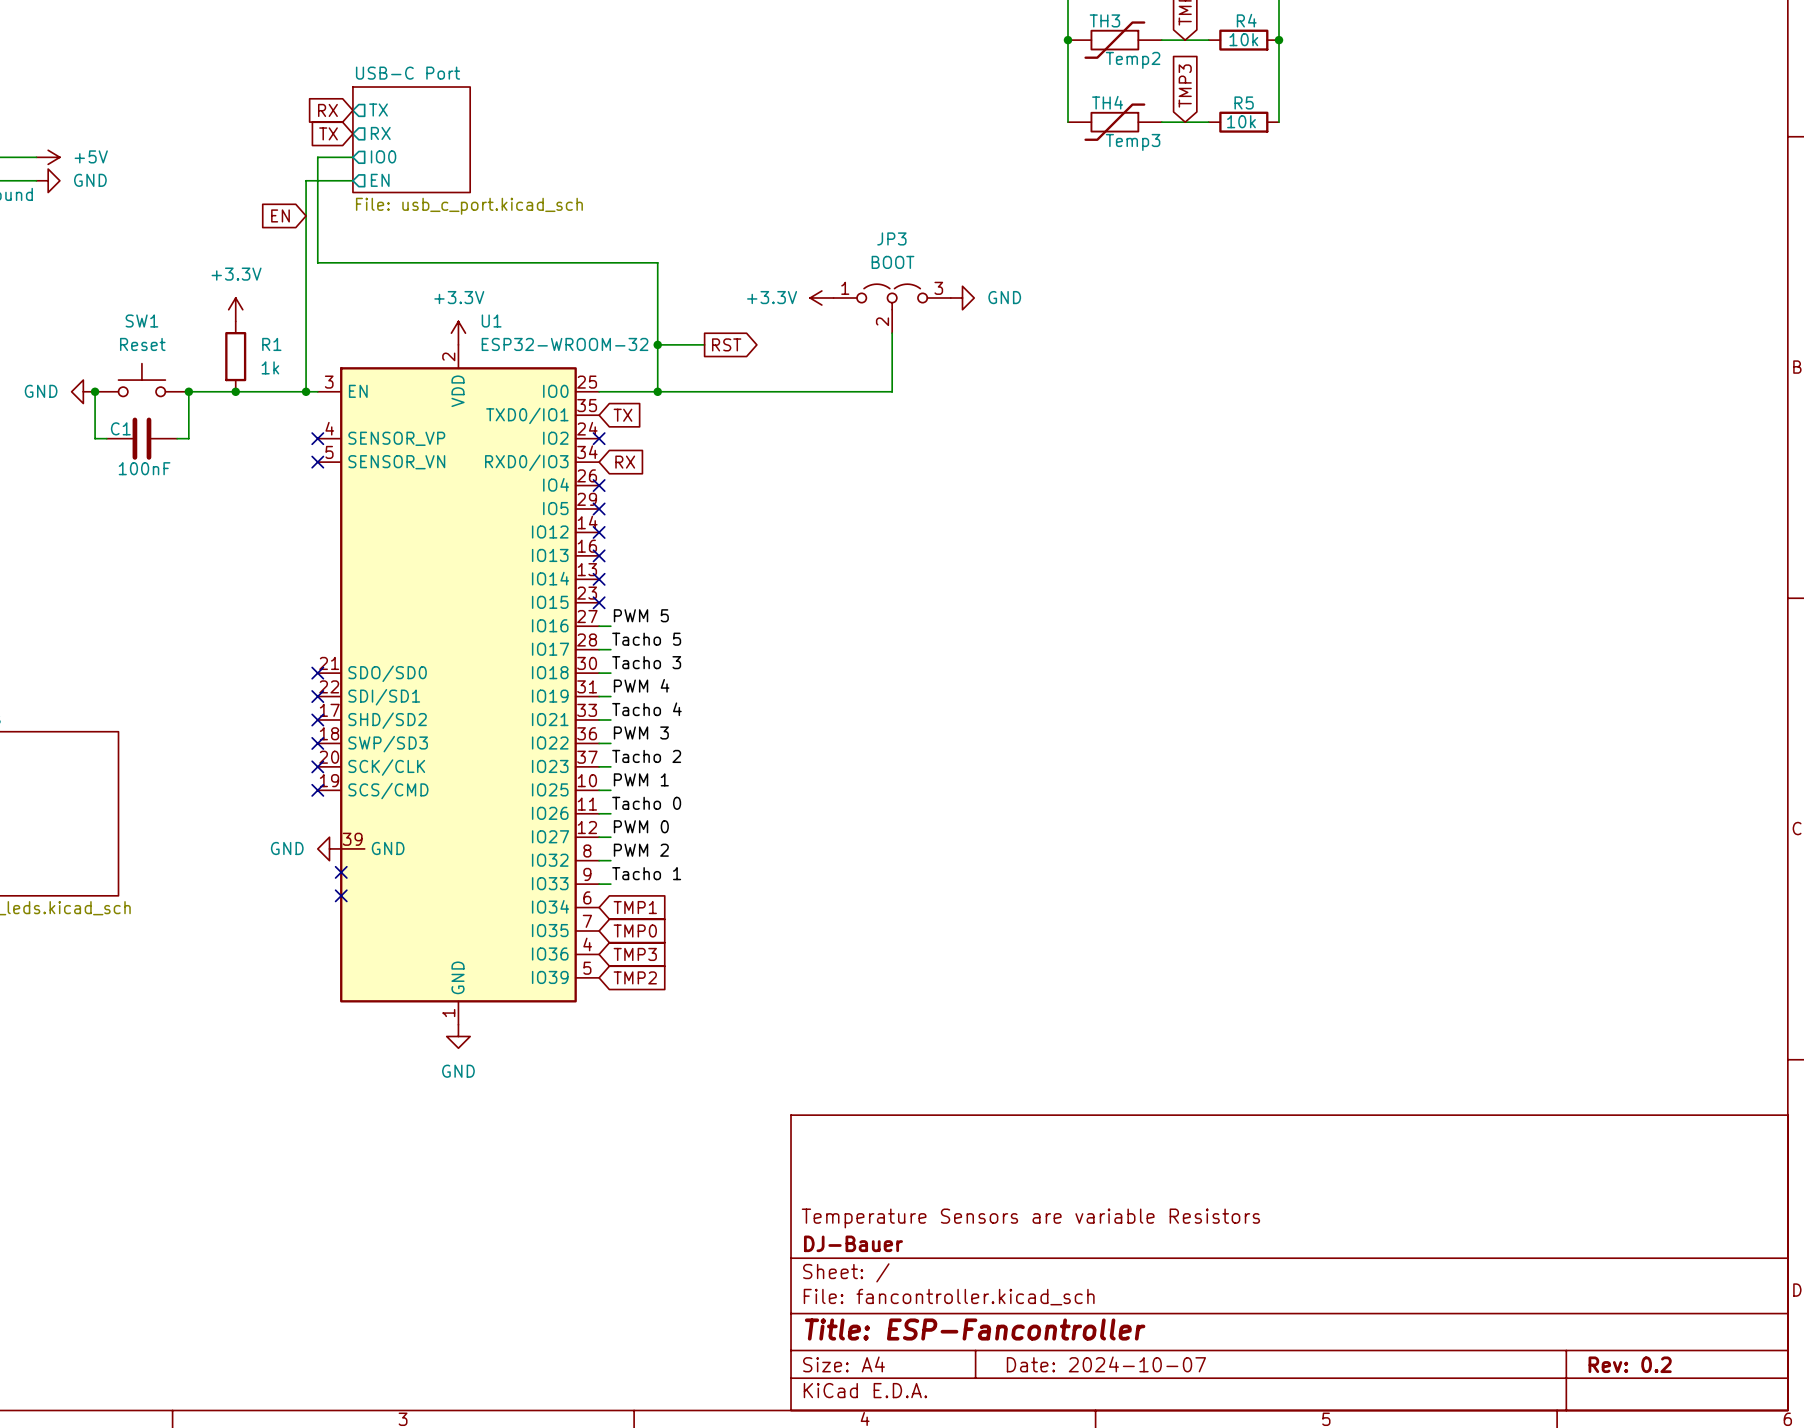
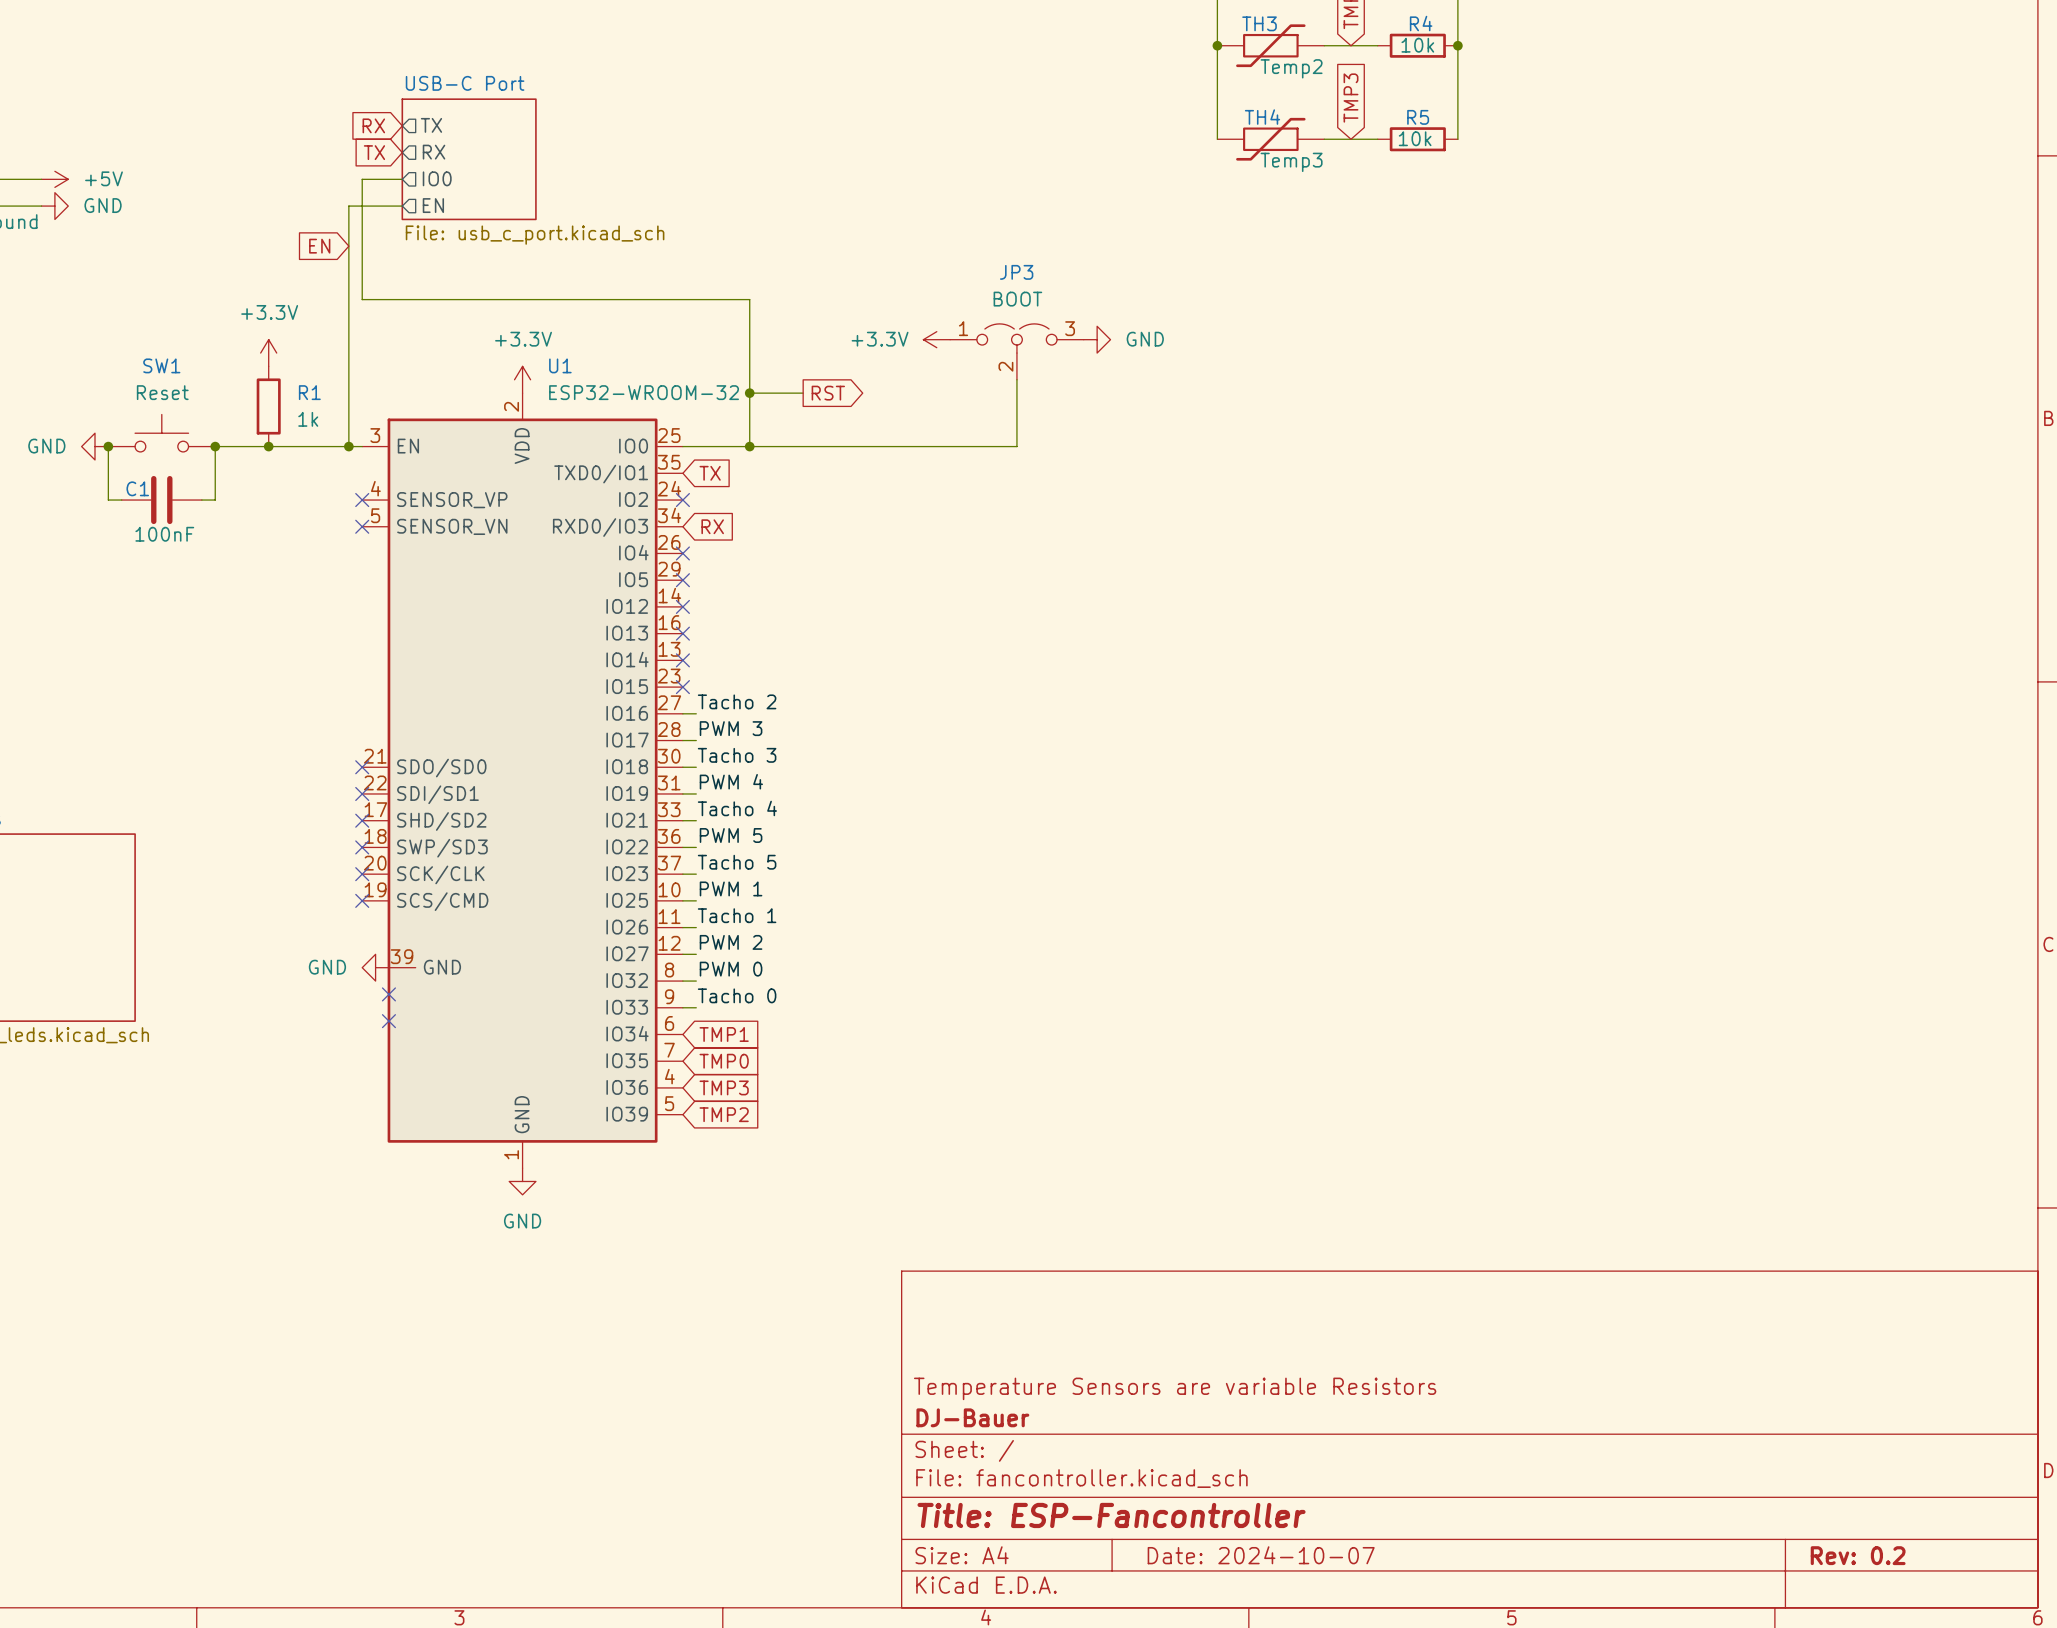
label: PWM 5 (641, 615) -> Tacho 2 (737, 701)
label: Tacho 5 (646, 639) -> PWM 3 (731, 728)
label: PWM 3 (641, 732) -> PWM 5 (731, 835)
label: Tacho 2 (646, 756) -> Tacho 5 (737, 862)
label: Tacho 0 (646, 803) -> Tacho 1 (737, 915)
label: PWM 0 (641, 826) -> PWM 2 (731, 942)
label: PWM 2 (641, 850) -> PWM 0 (731, 969)
label: Tacho 1 (646, 873) -> Tacho 0 (737, 995)

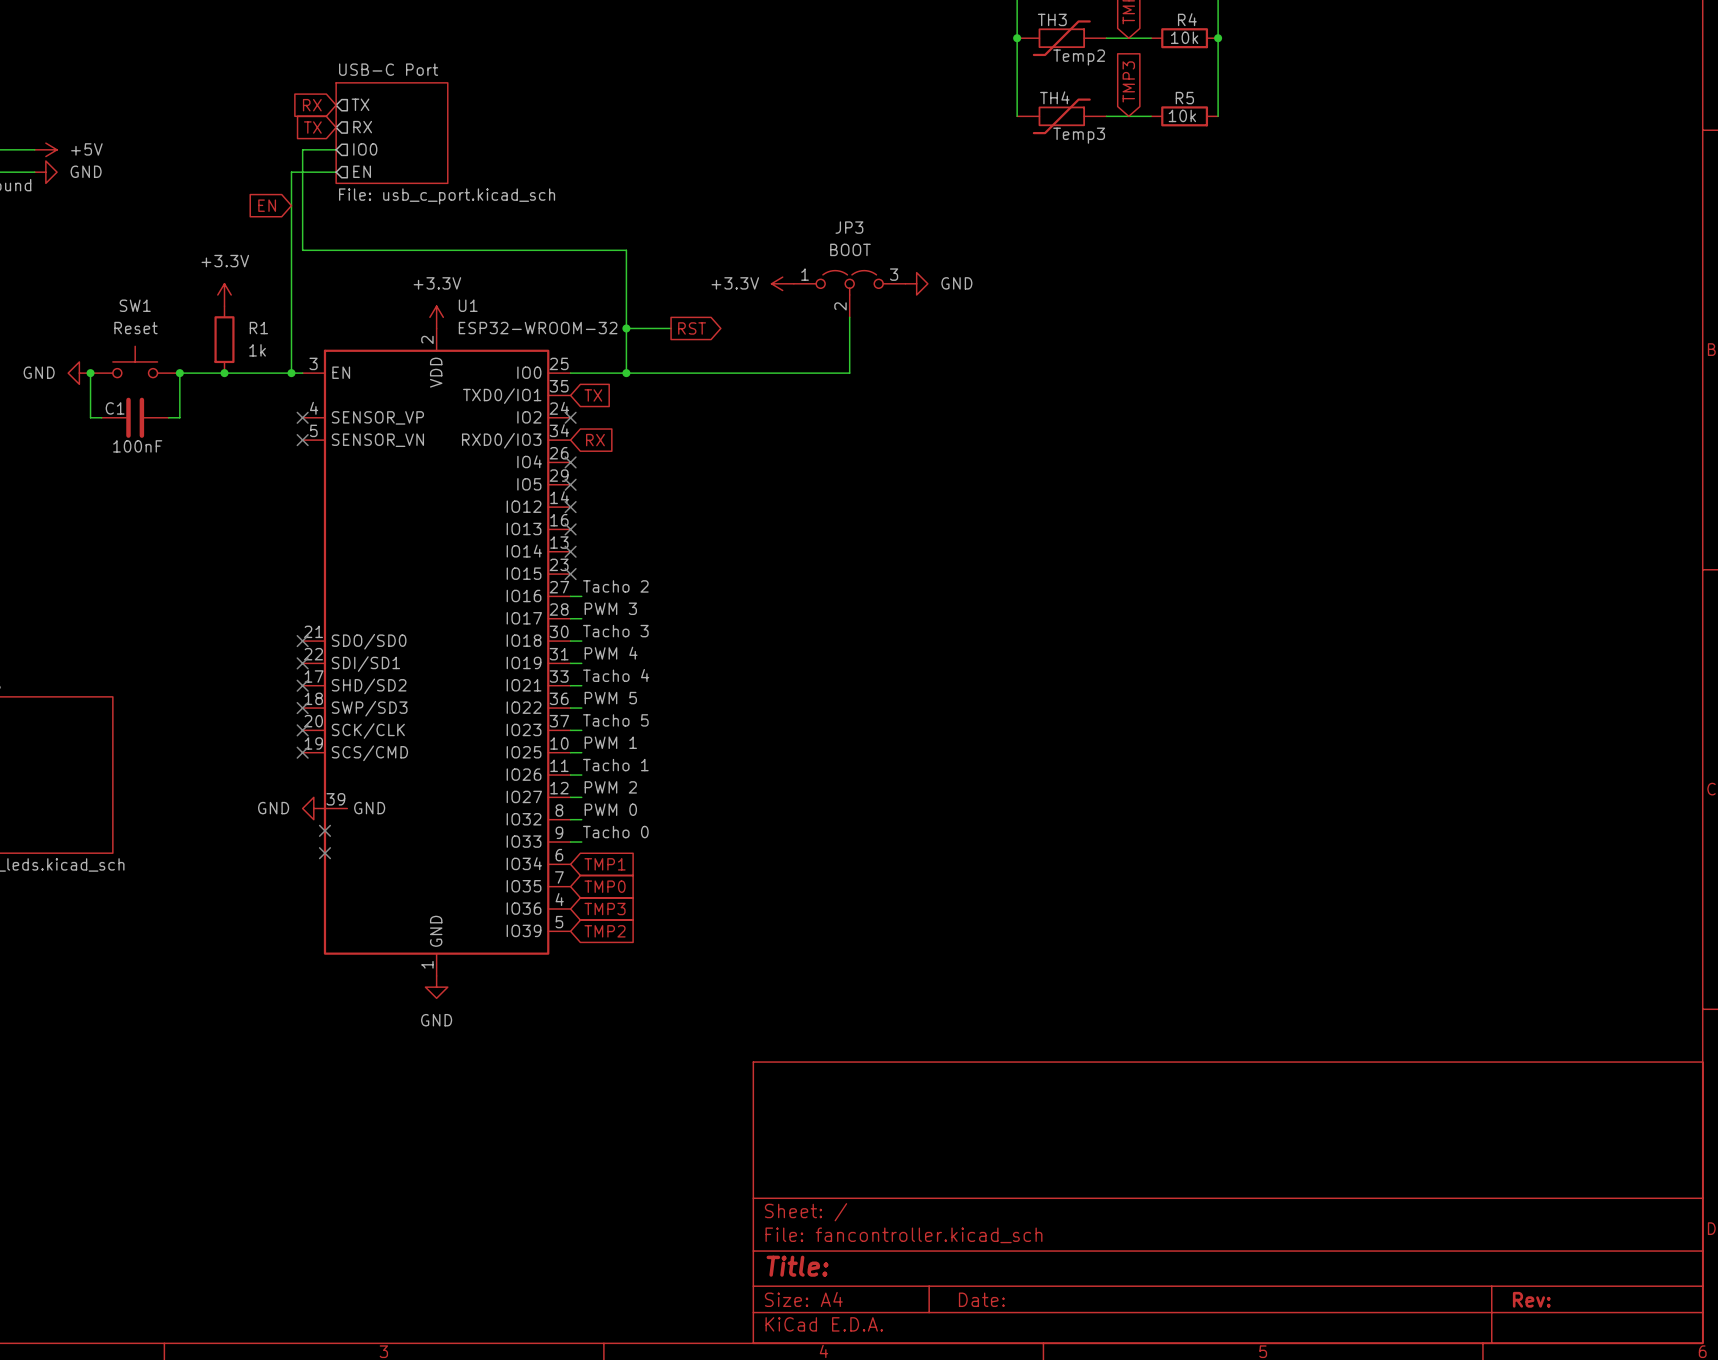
title block: Temperature Sensors are variable Resistors (1175, 1388) -> none
title block: DJ-Bauer (972, 1417) -> none
title block: Title: ESP-Fancontroller (1111, 1515) -> Title: (797, 1266)
title block: Date: 2024-10-07 (1261, 1555) -> Date: (981, 1299)
title block: Rev: 0.2 (1858, 1555) -> Rev: (1531, 1299)

